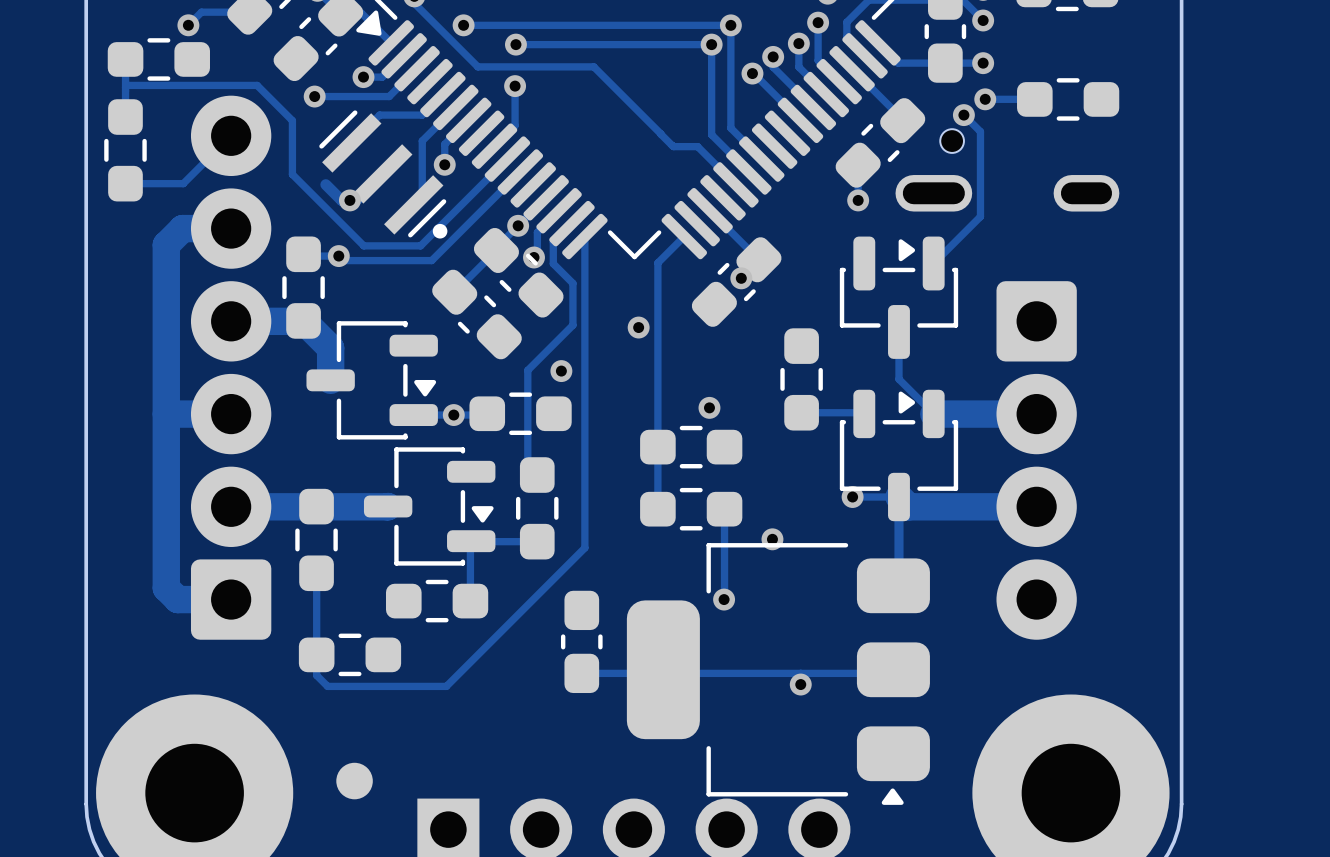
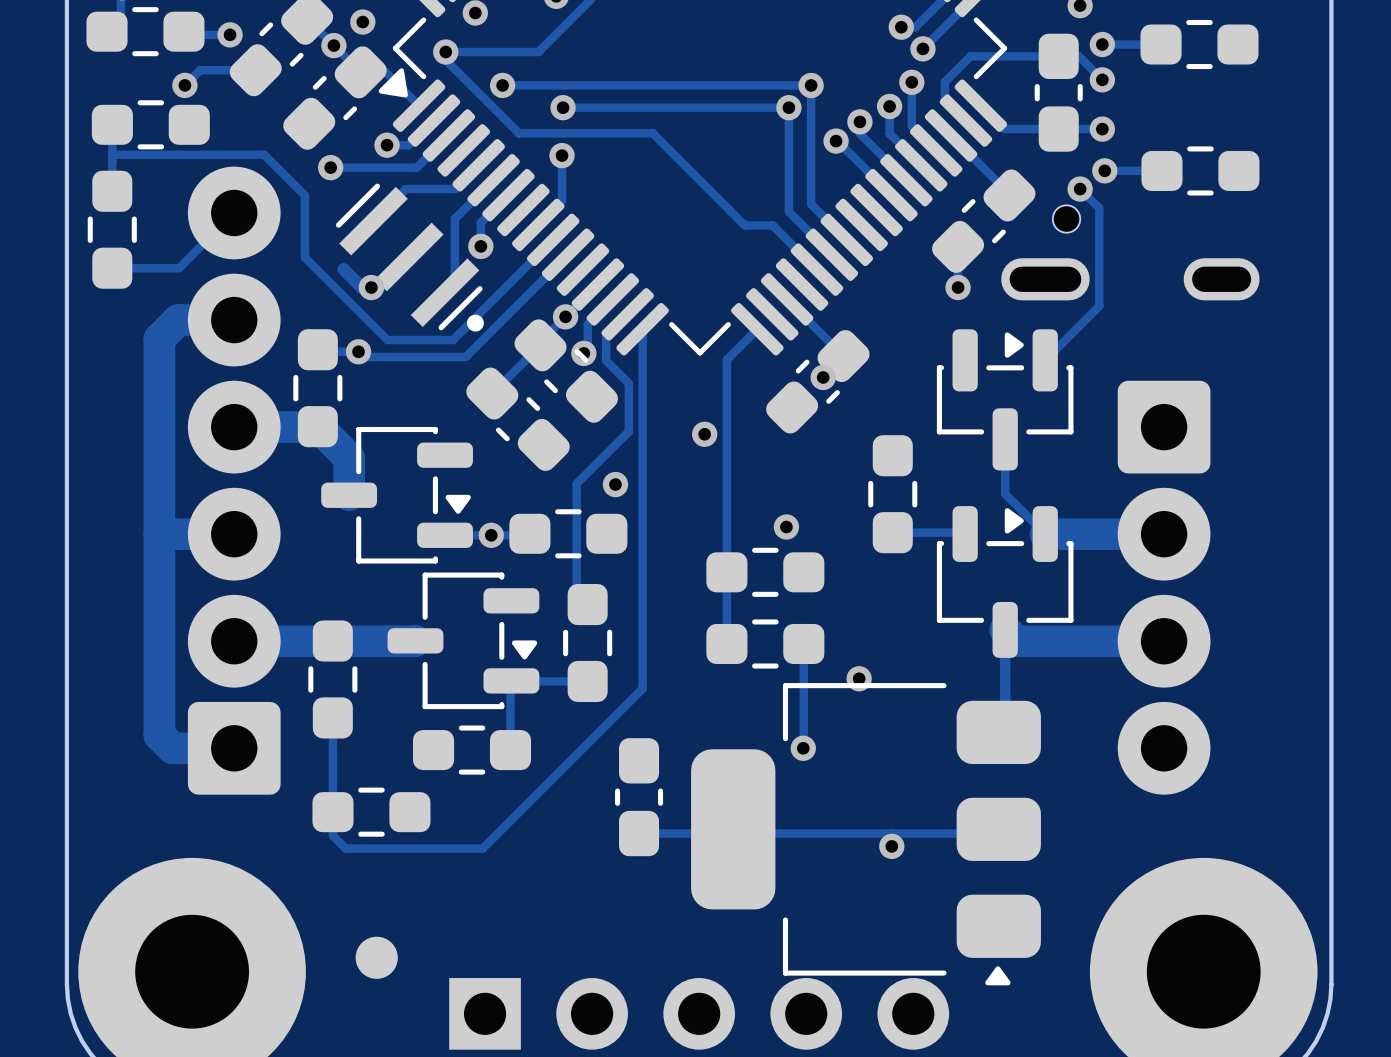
via: (852, 497) -> none
track: (898, 497) (852, 497) -> none

